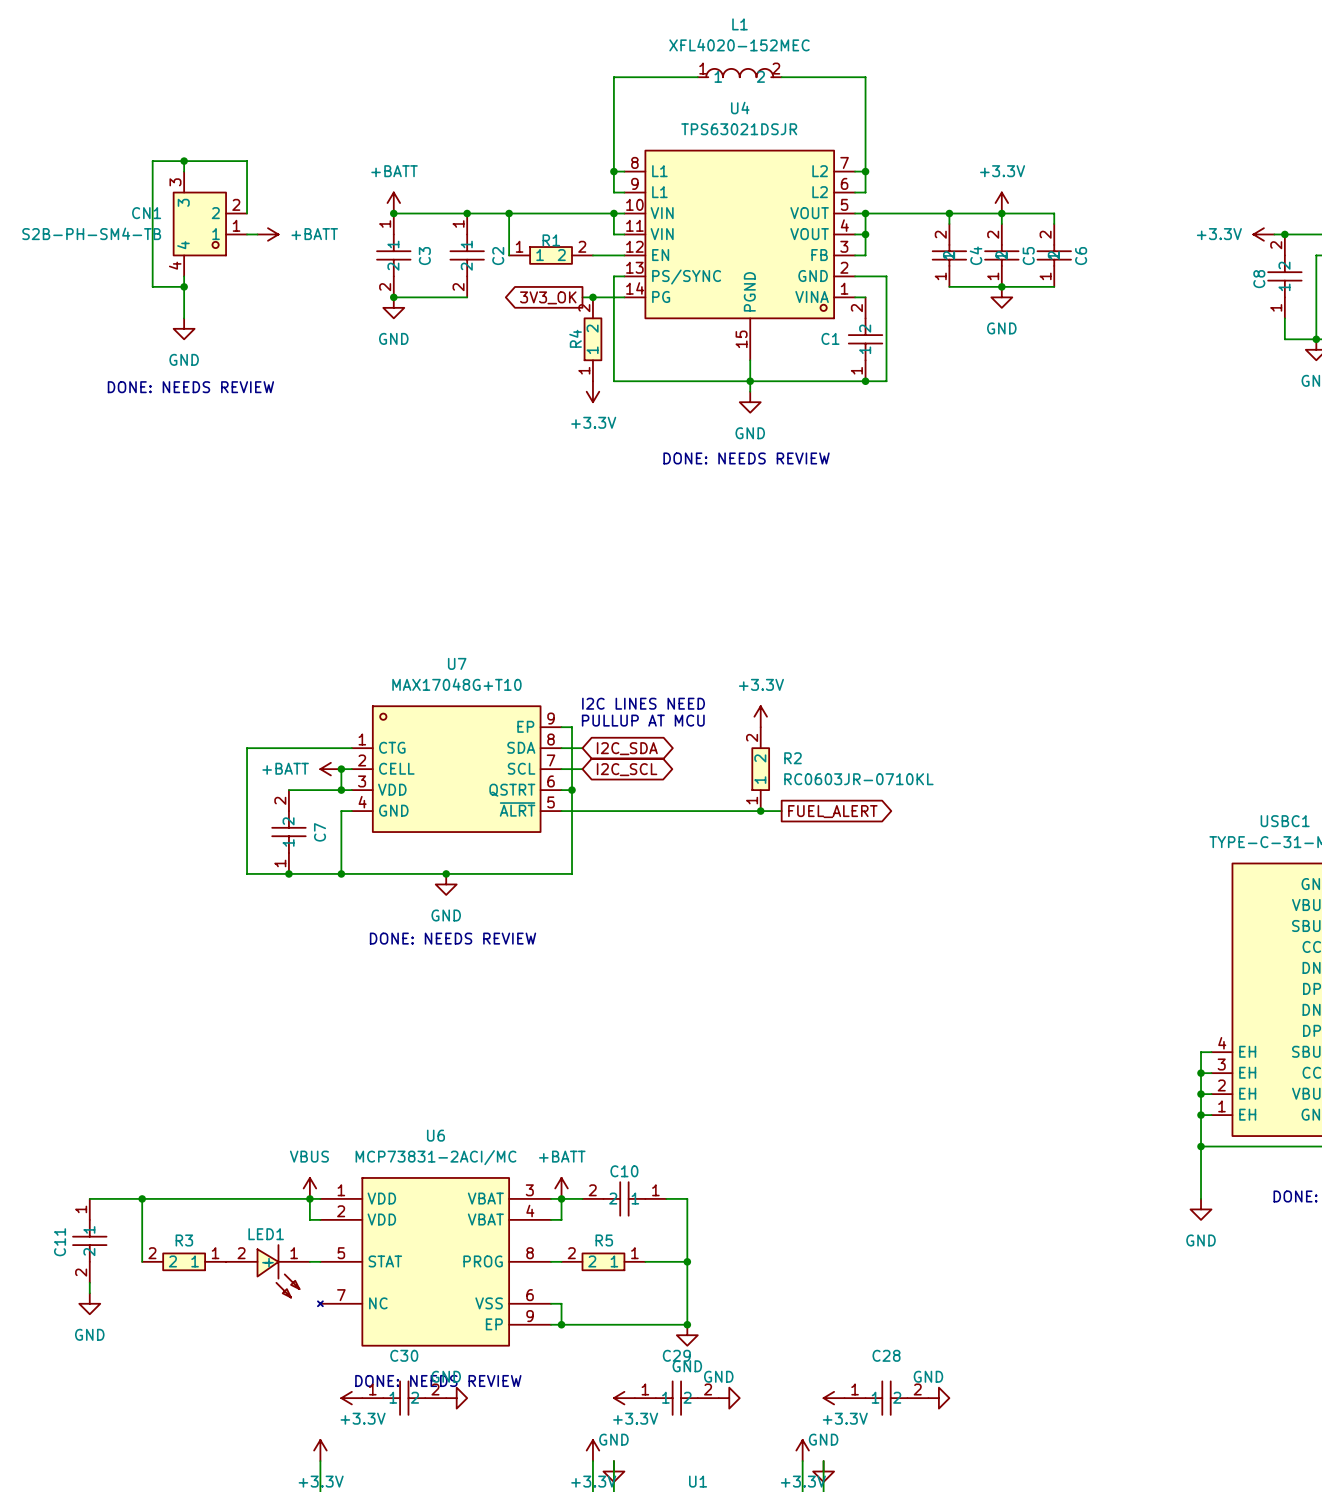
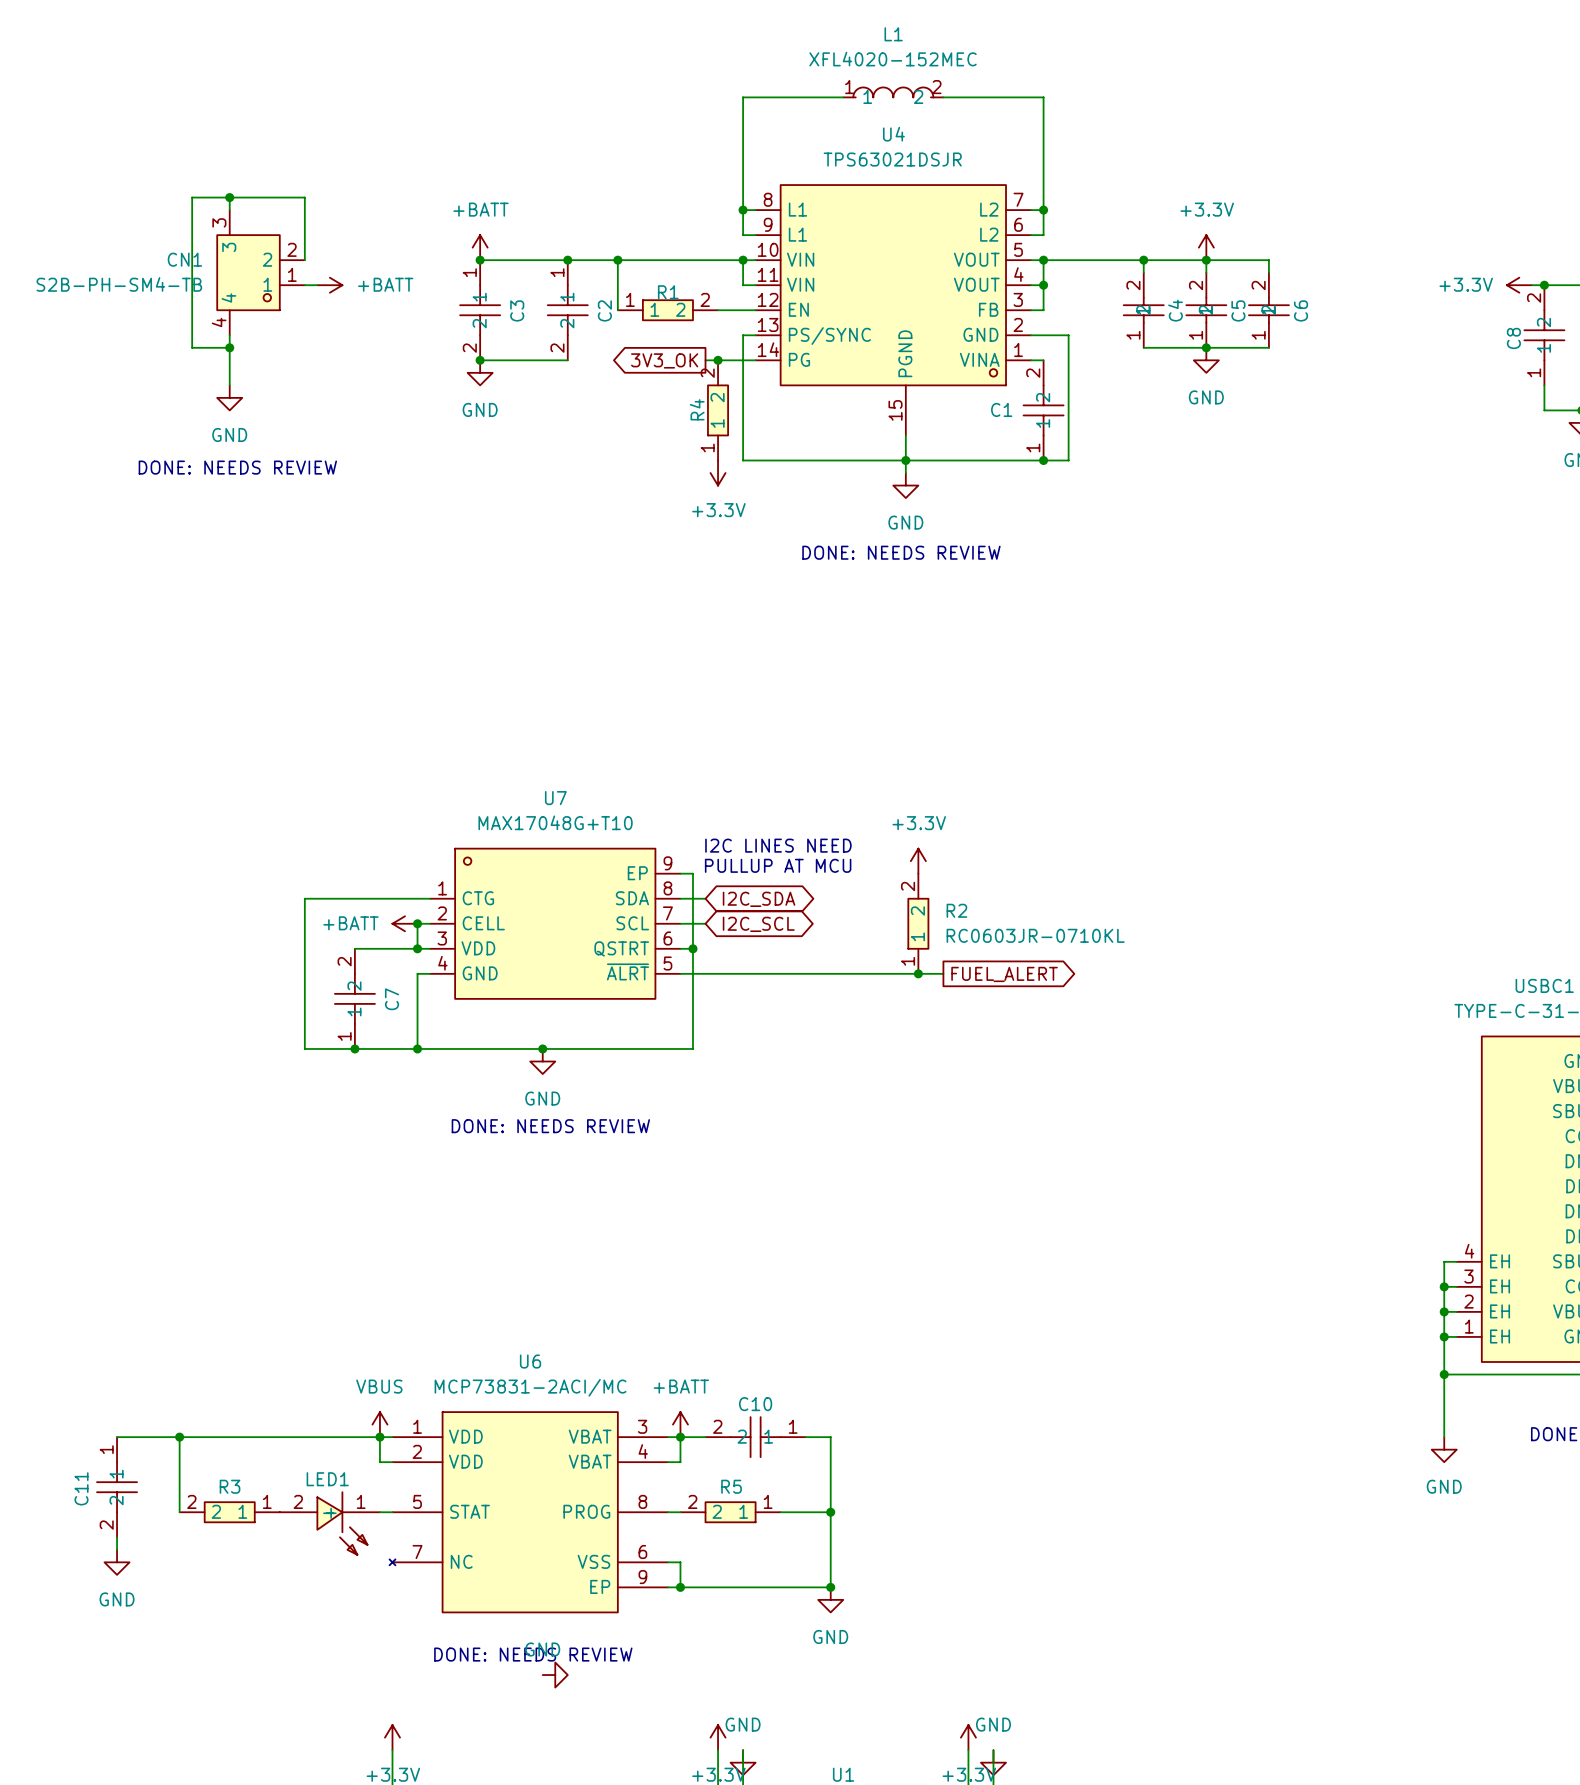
power symbol: +3.3V (351, 1398) -> none
C30: (404, 1398) -> none
power symbol: +3.3V (624, 1398) -> none
C29: (676, 1398) -> none
power symbol: GND (729, 1398) -> none
power symbol: +3.3V (834, 1398) -> none
C28: (886, 1398) -> none
power symbol: GND (938, 1398) -> none

